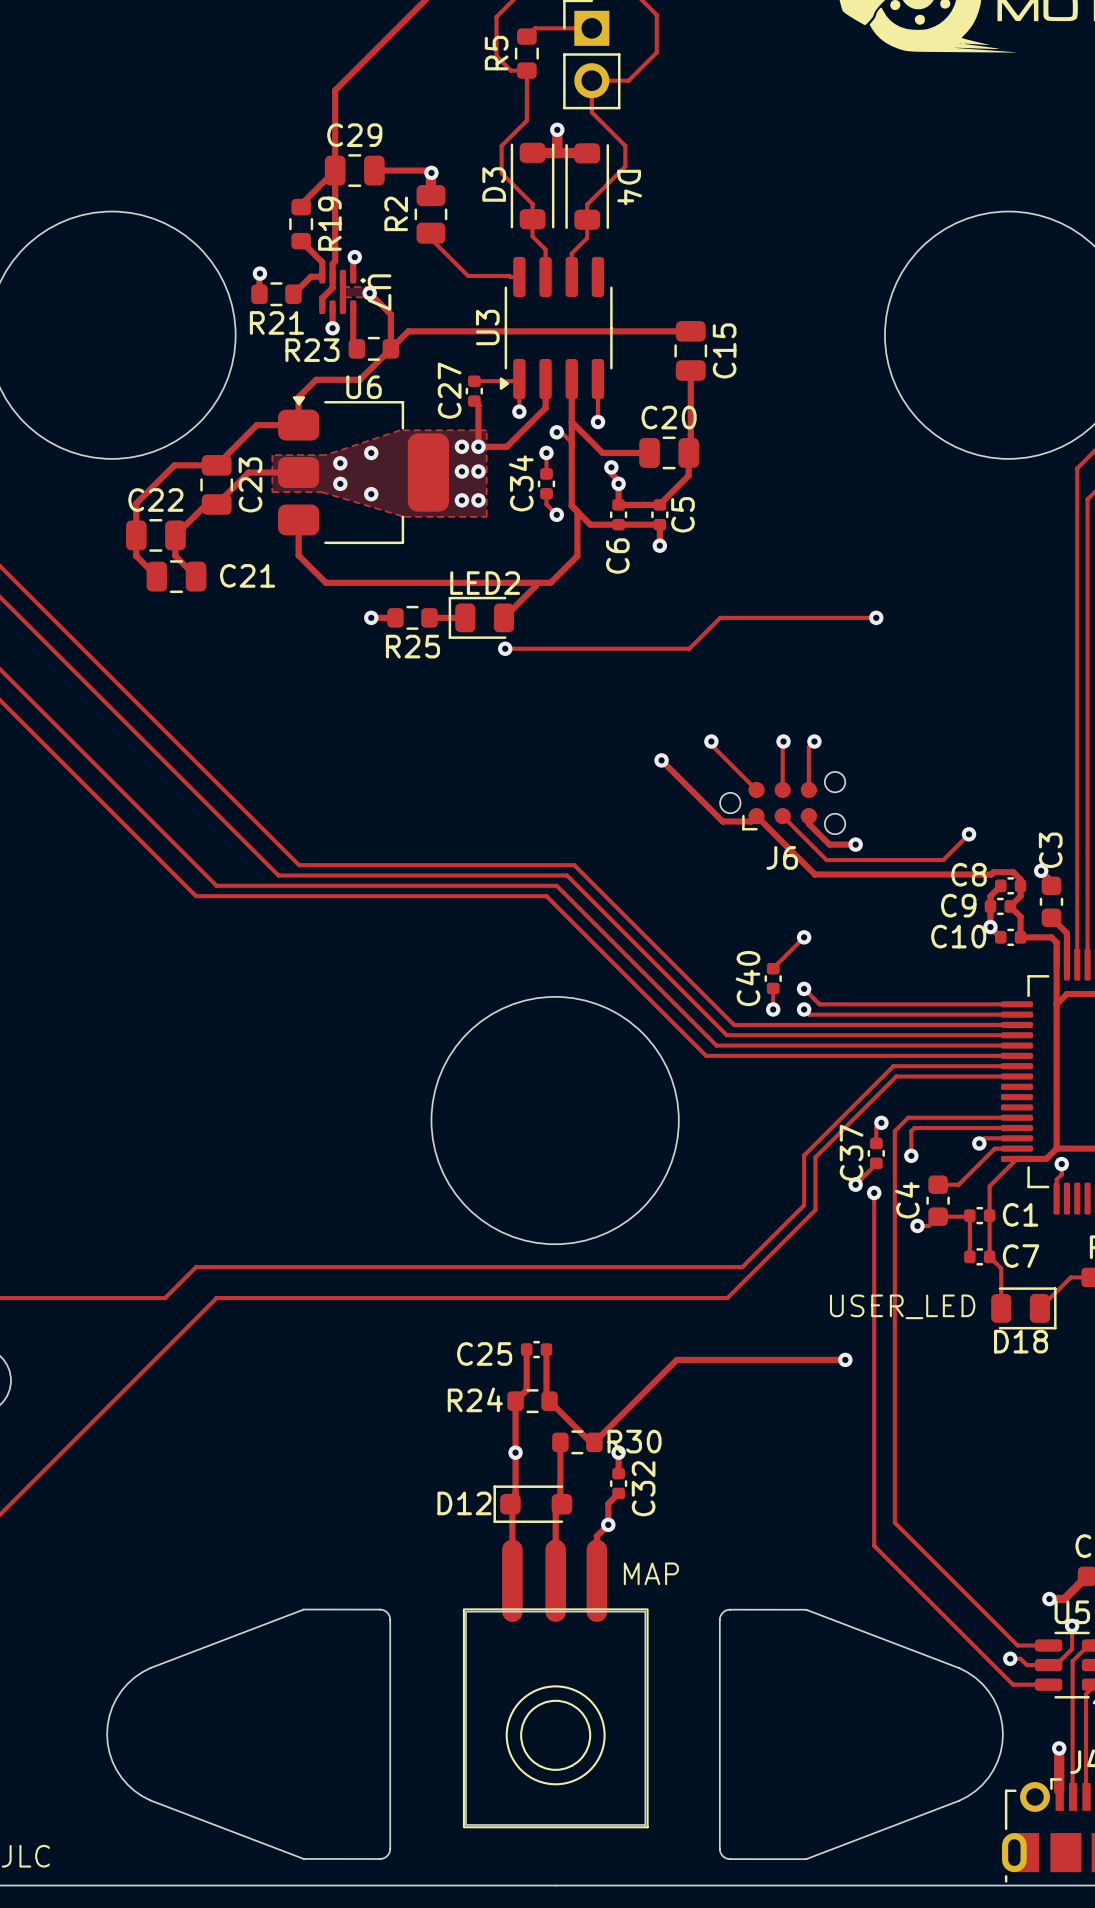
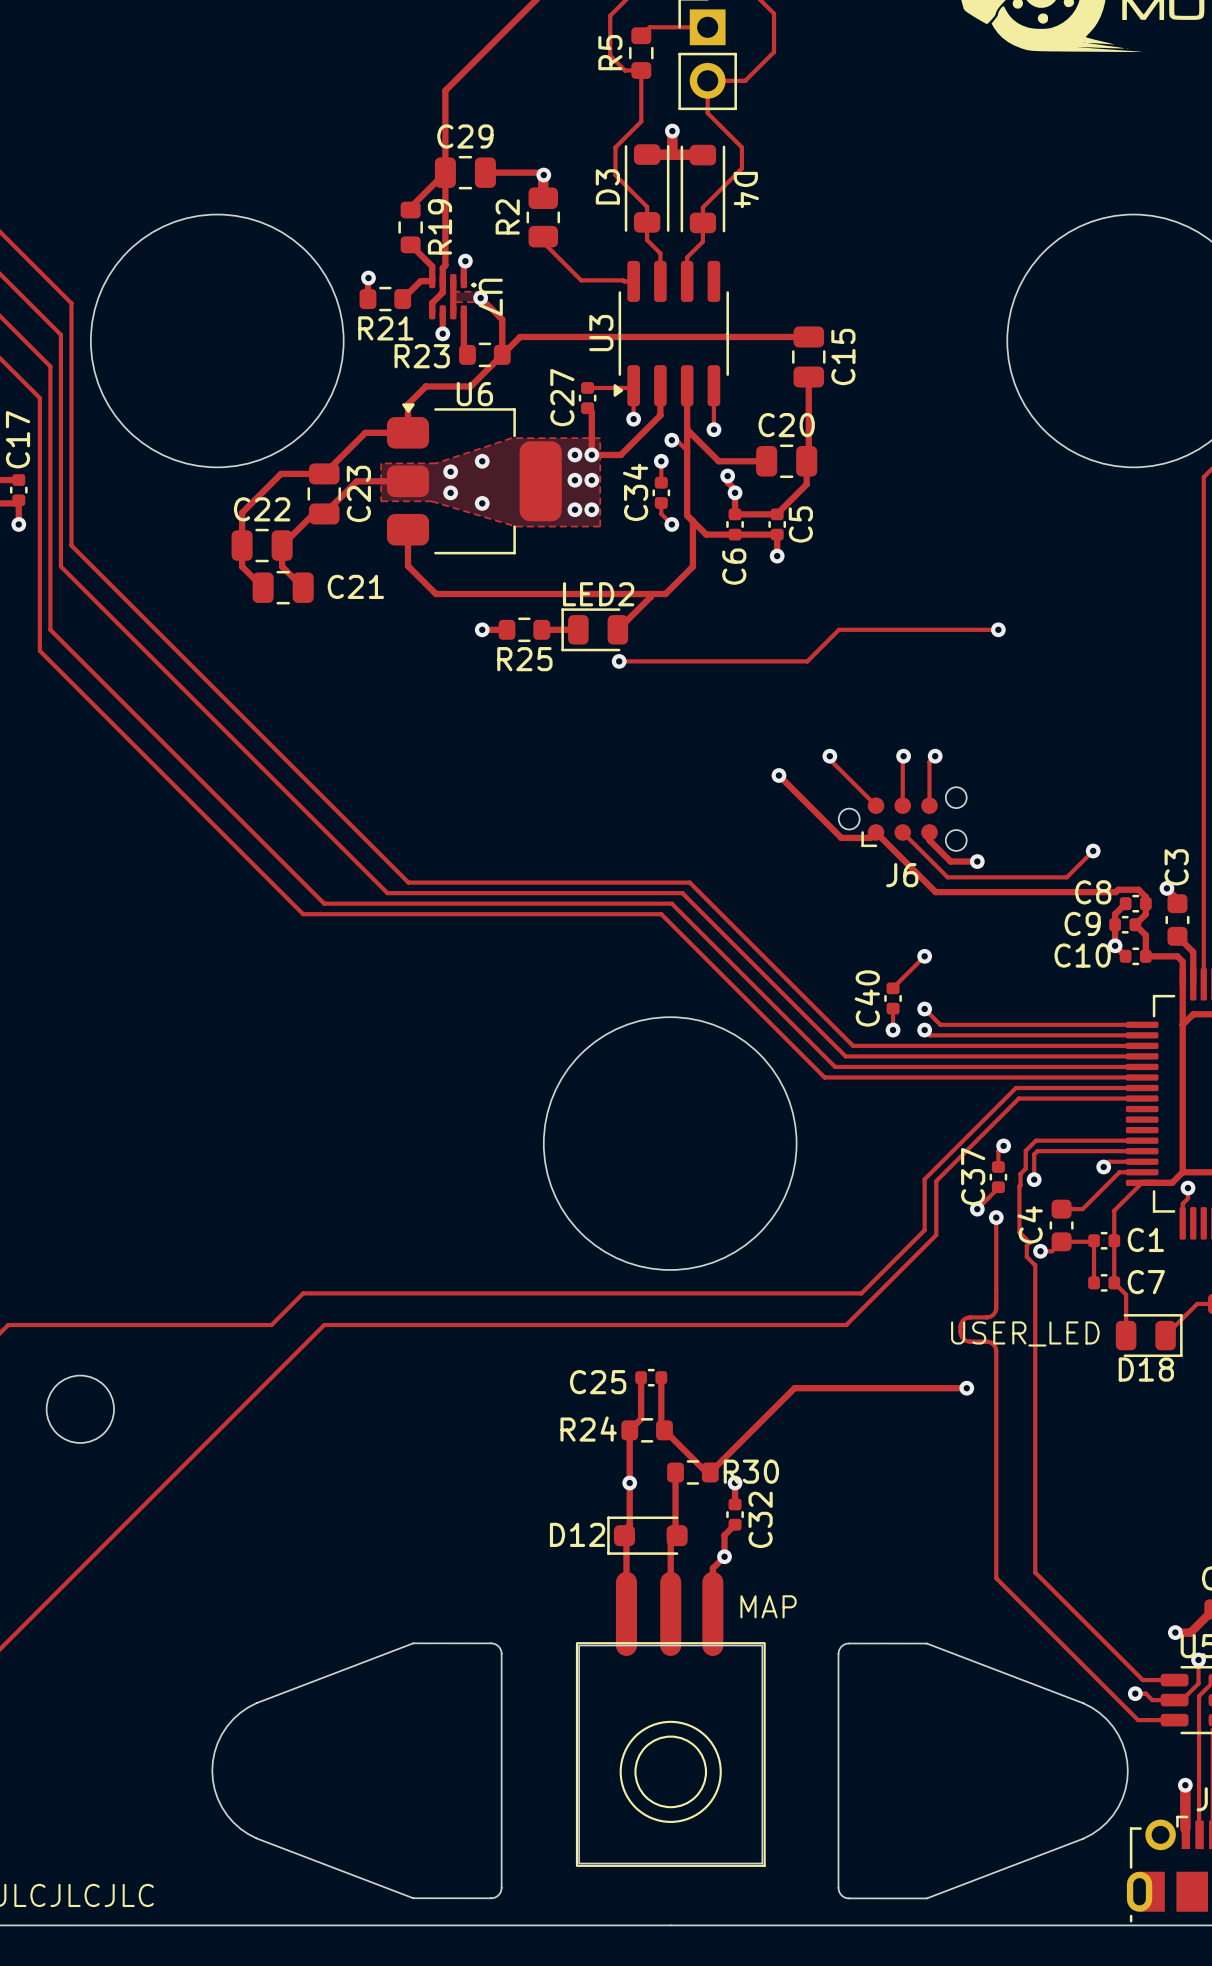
track: (913, 1117) (908, 1117) (894, 1131) (894, 1522) (912, 1540) -> (1035, 1264) (1035, 1572)
track: none -> (1035, 1140) (1025, 1150) (1025, 1168) (1020, 1173) (1019, 1186) (1019, 1232) (1029, 1242) (1026, 1245) (1026, 1256) (1034, 1264)
track: (874, 1281) (874, 1323) -> (996, 1307) (991, 1316) (966, 1318) (961, 1322) (960, 1327) (960, 1334) (964, 1339) (990, 1342) (994, 1346) (996, 1351)

